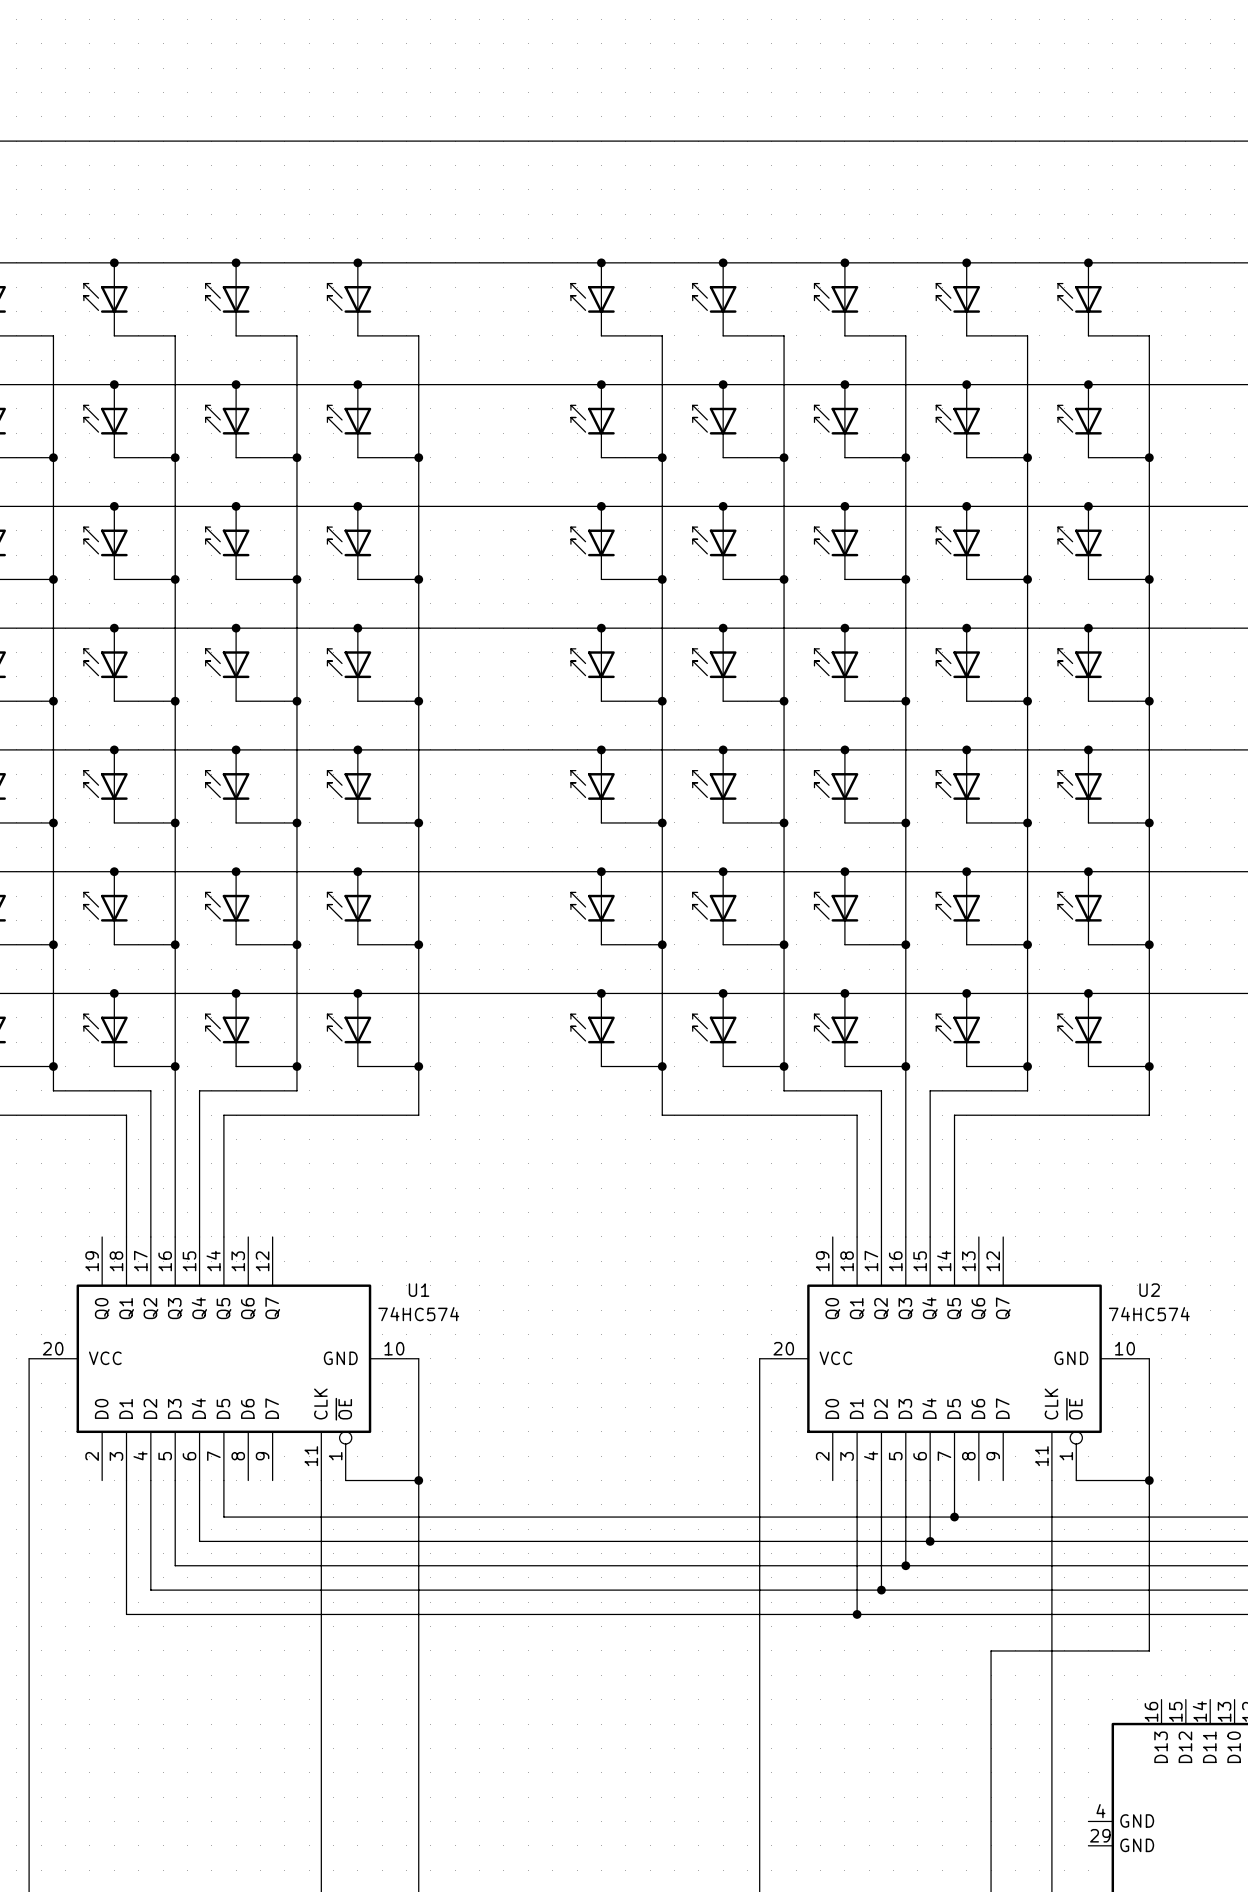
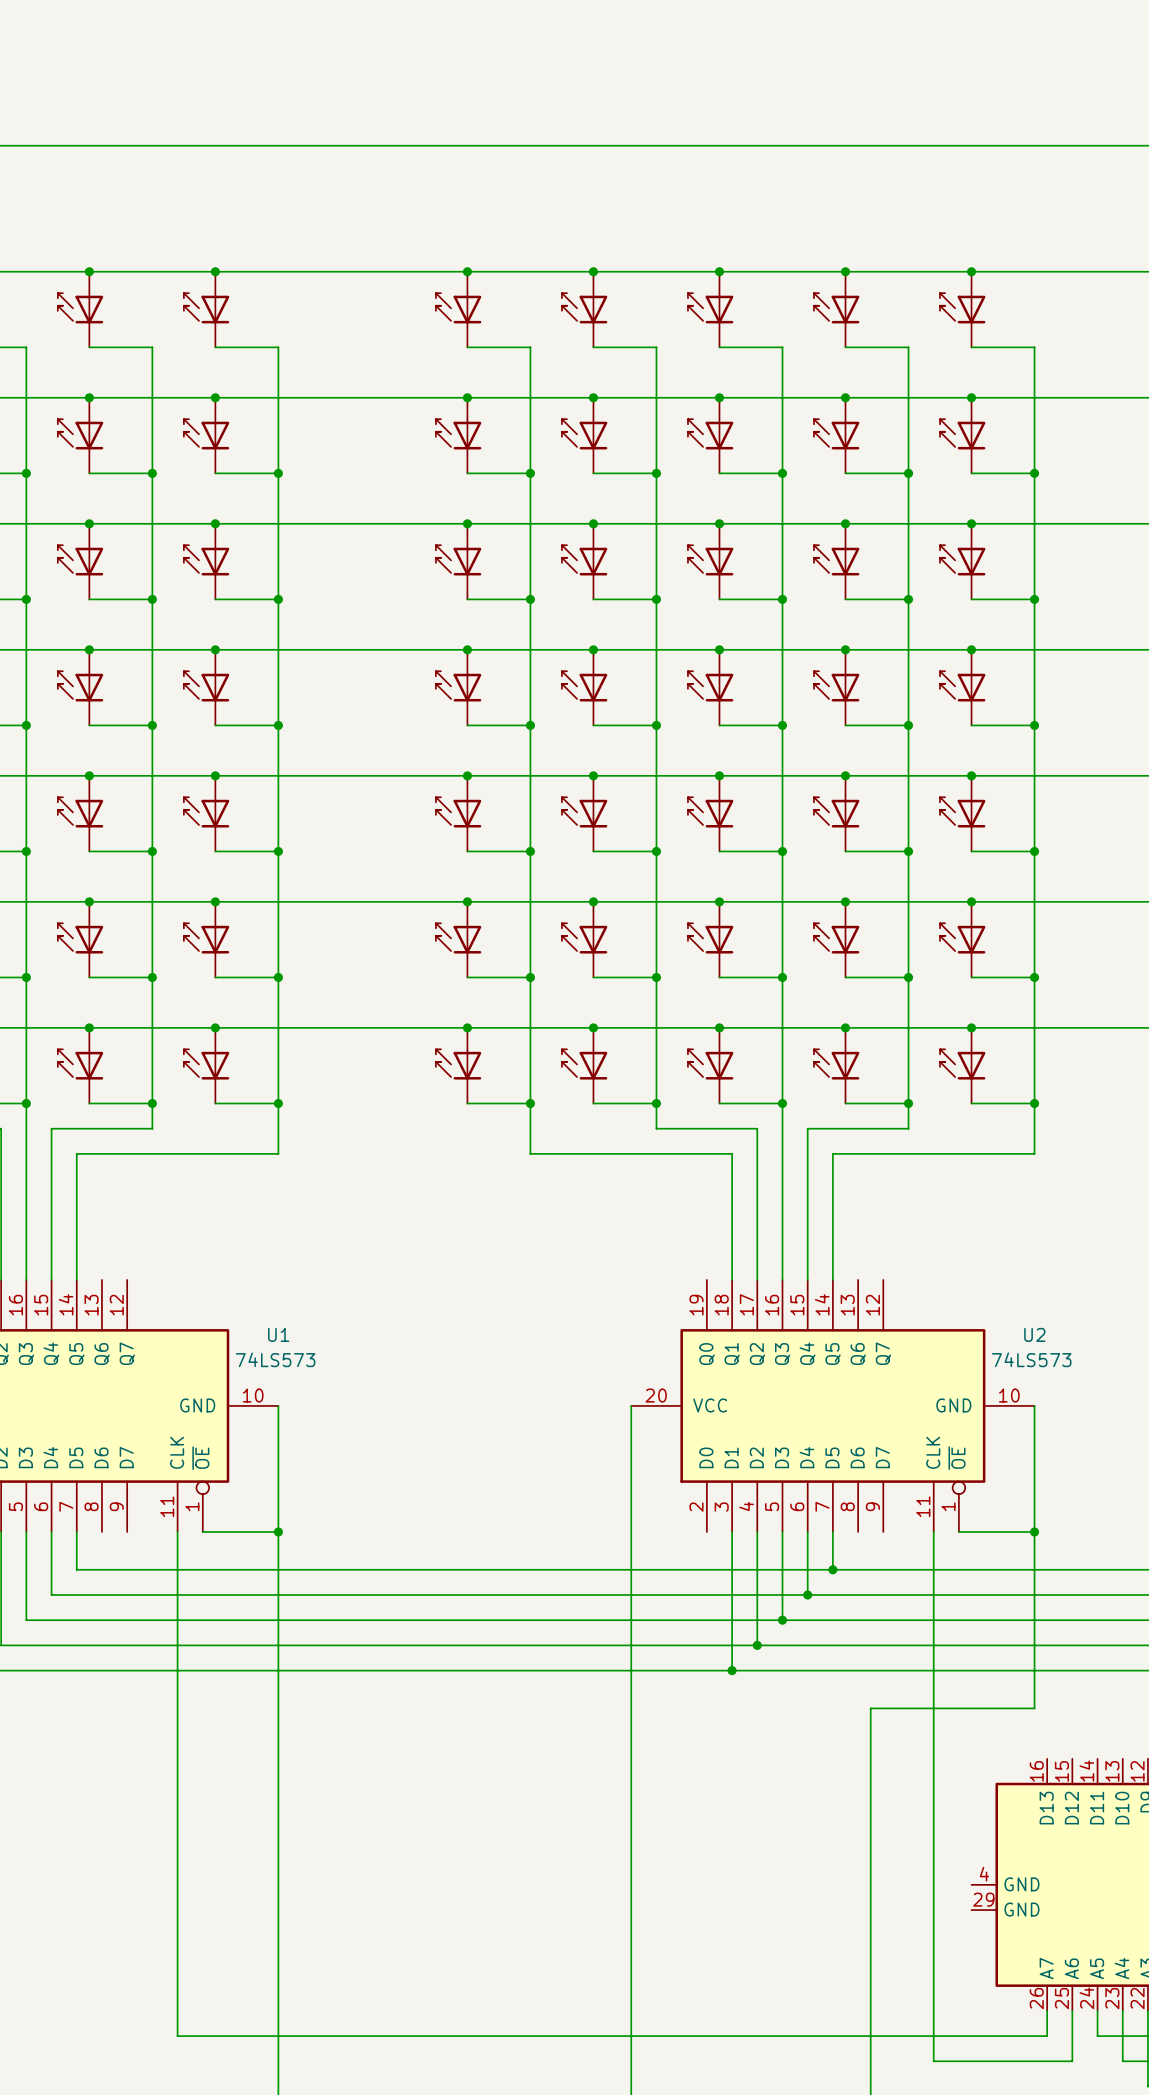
U1 value: 74HC574 (418, 1314) -> 74LS573 (275, 1359)
U2 value: 74HC574 (1149, 1314) -> 74LS573 (1031, 1359)

